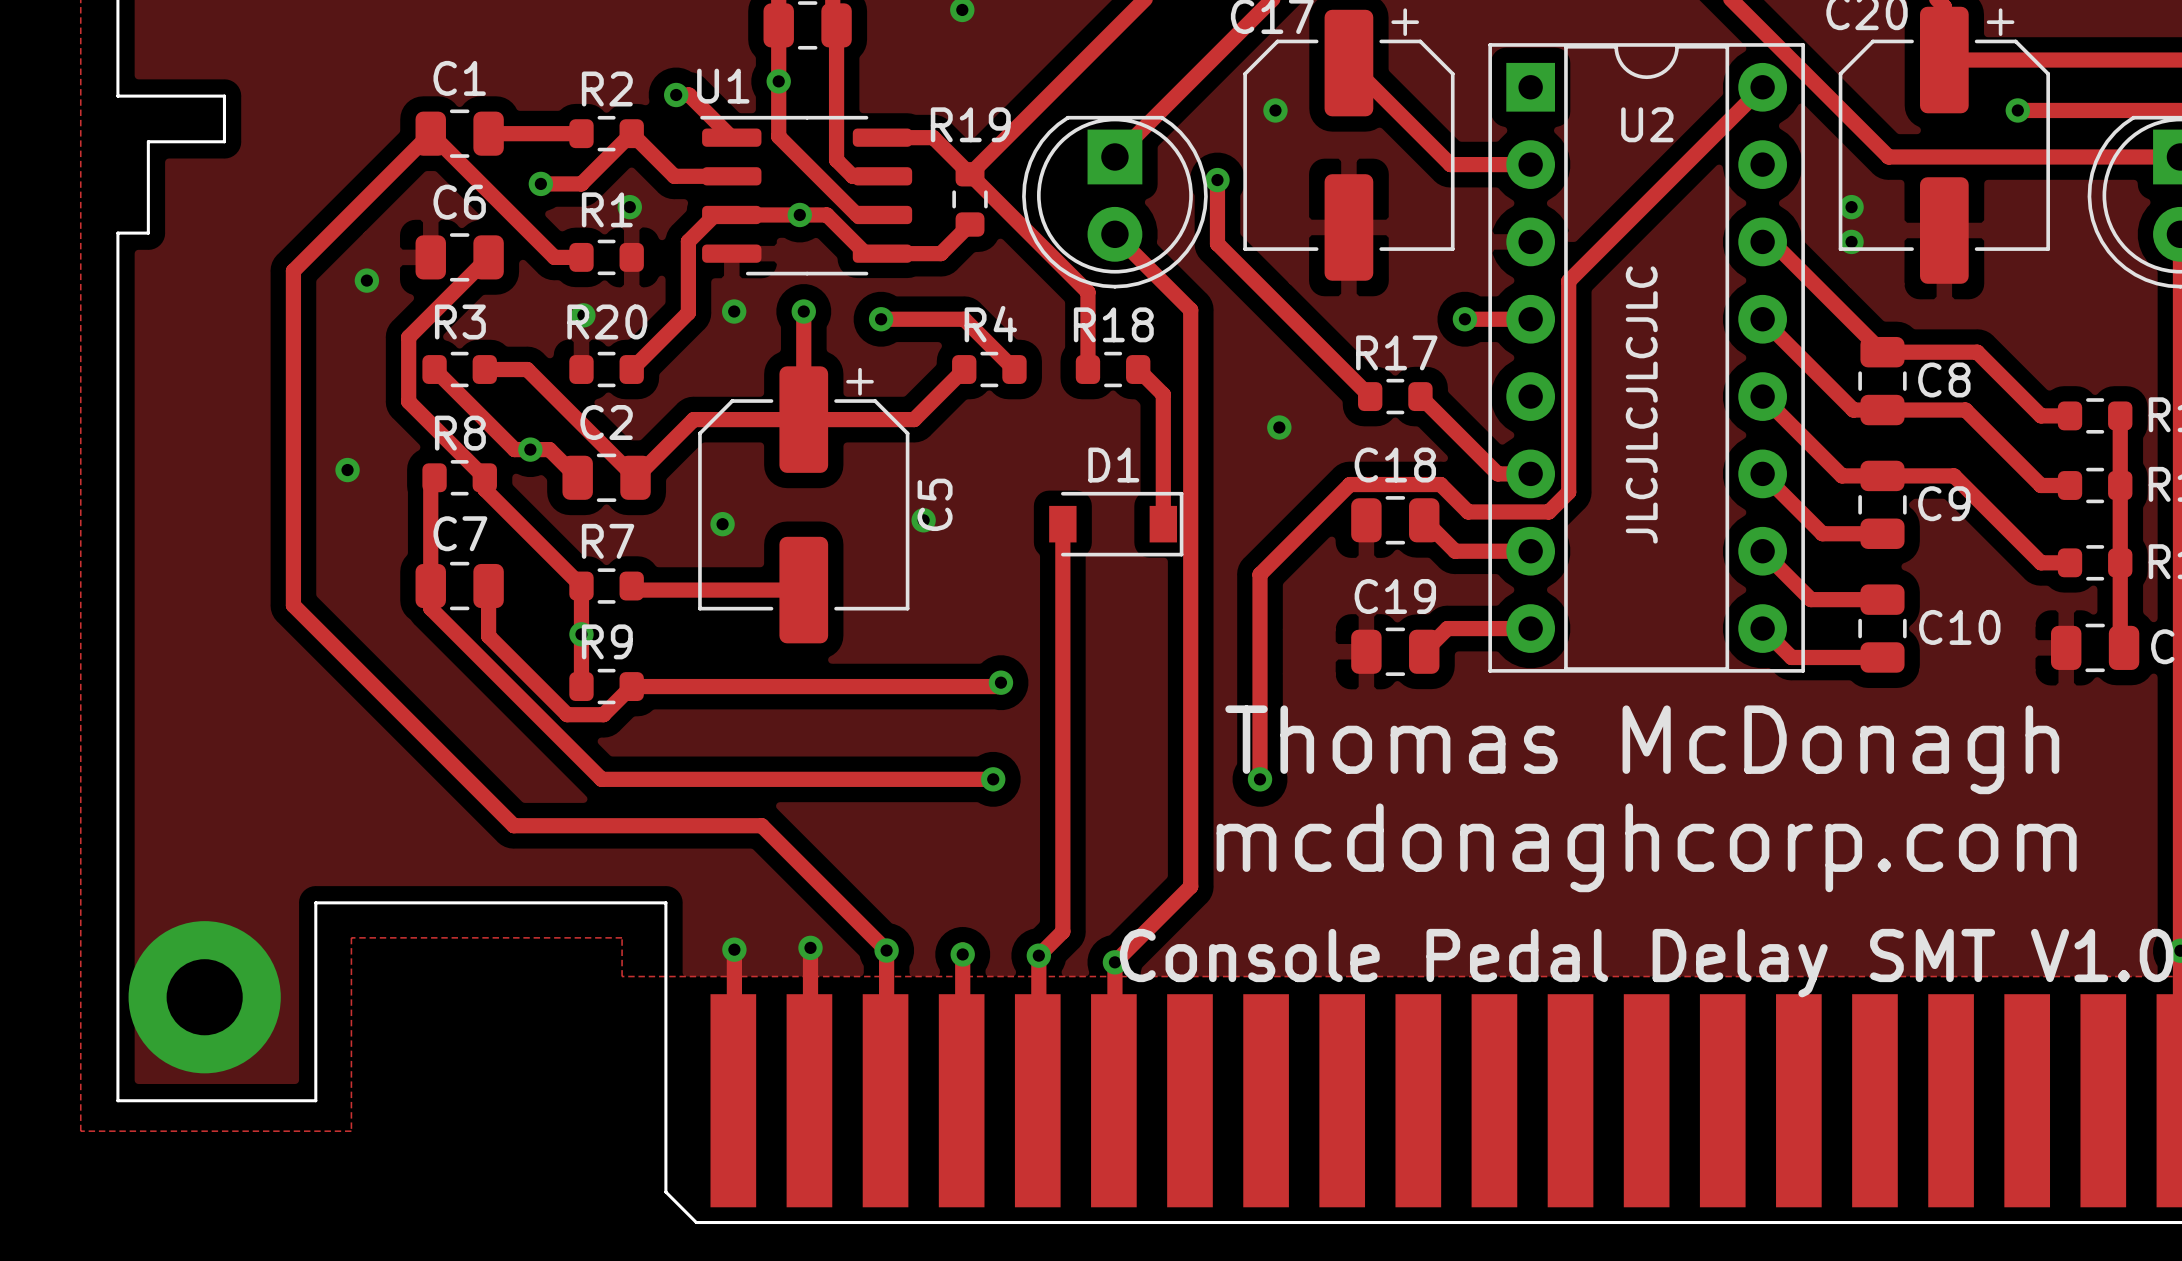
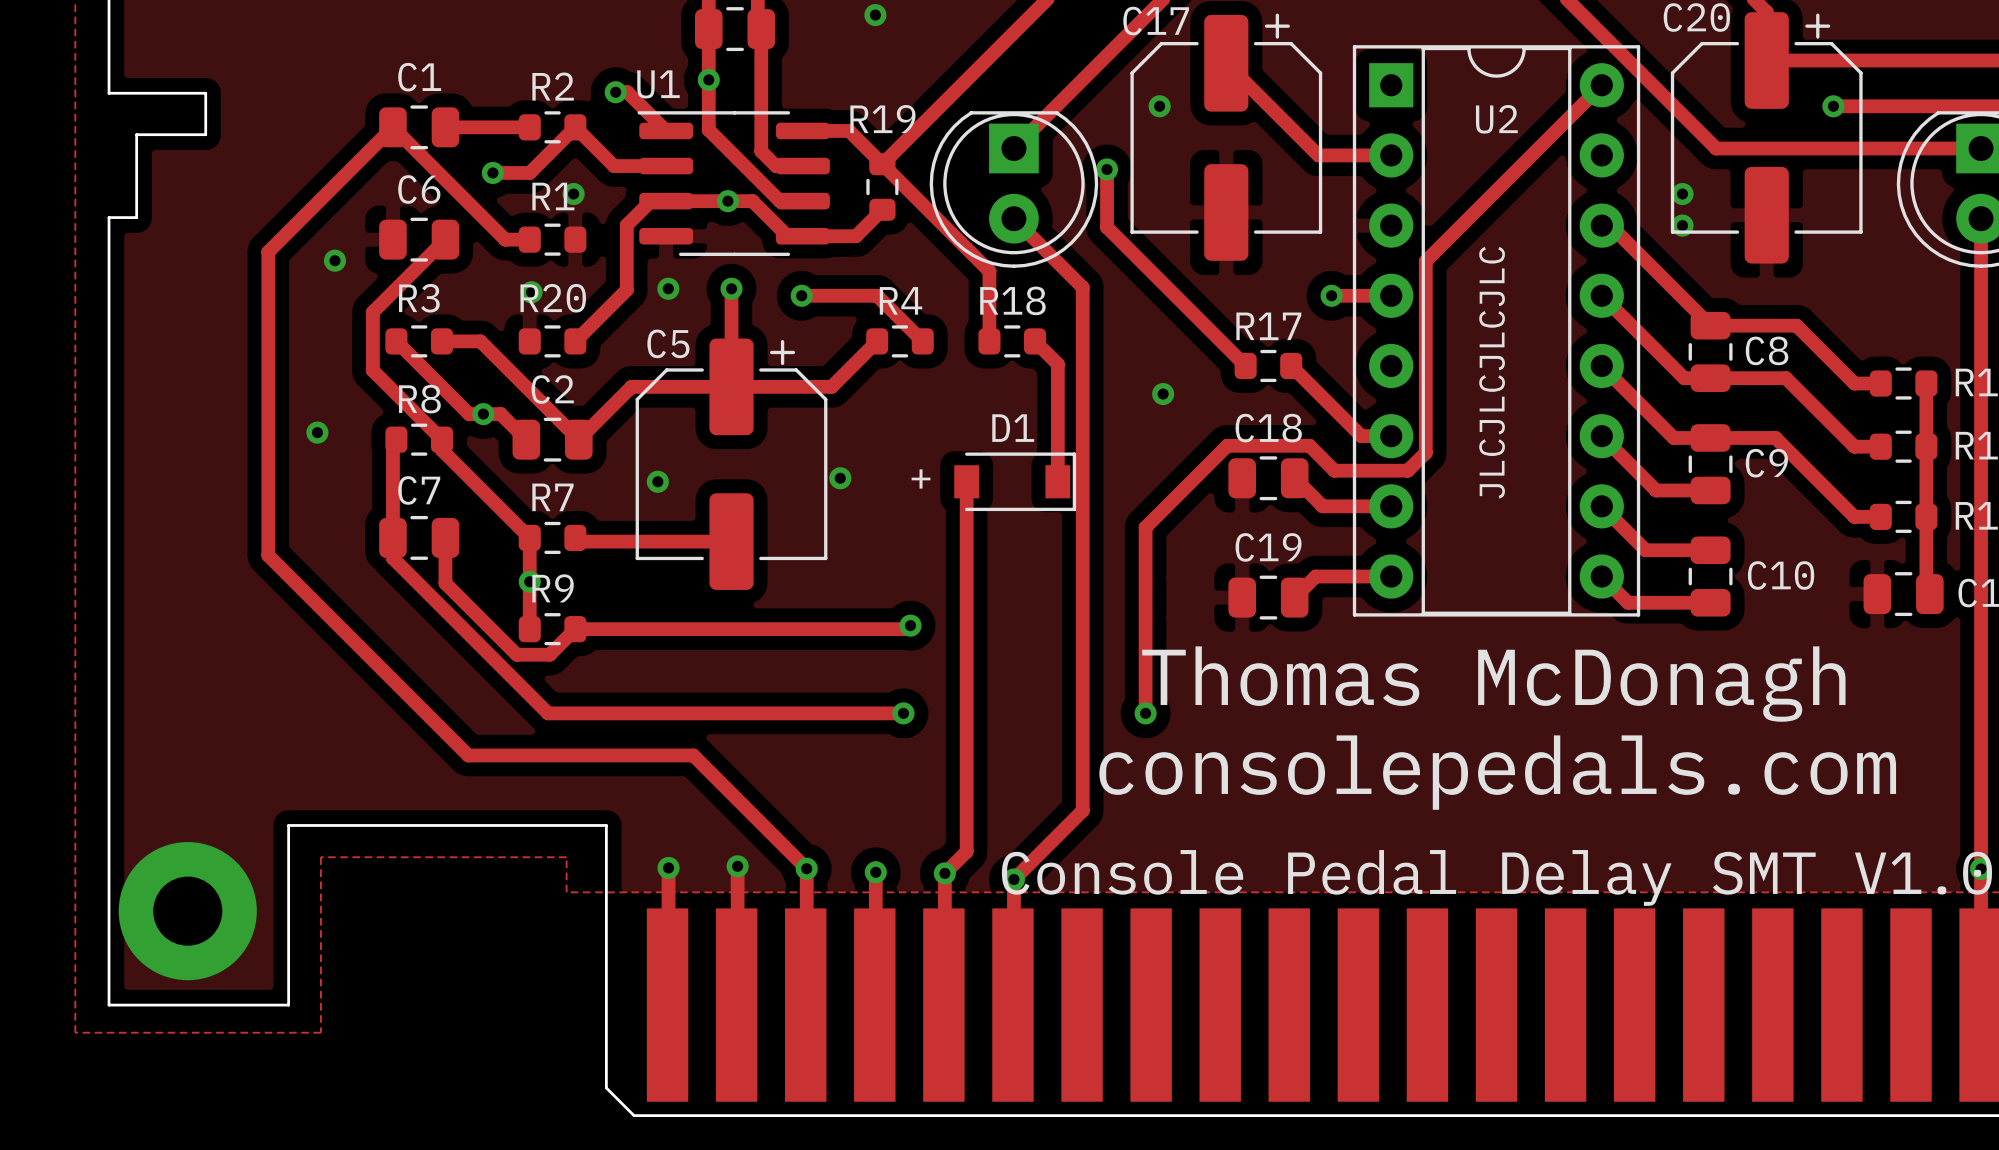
C5 name rotation: 0° (935, 504) -> 90° clockwise (668, 343)
C5 name position: C5 (935, 504) -> C5 (668, 343)
text: none -> + (921, 478)
text: mcdonaghcorp.com (1646, 847) -> consolepedals.com (1497, 772)

